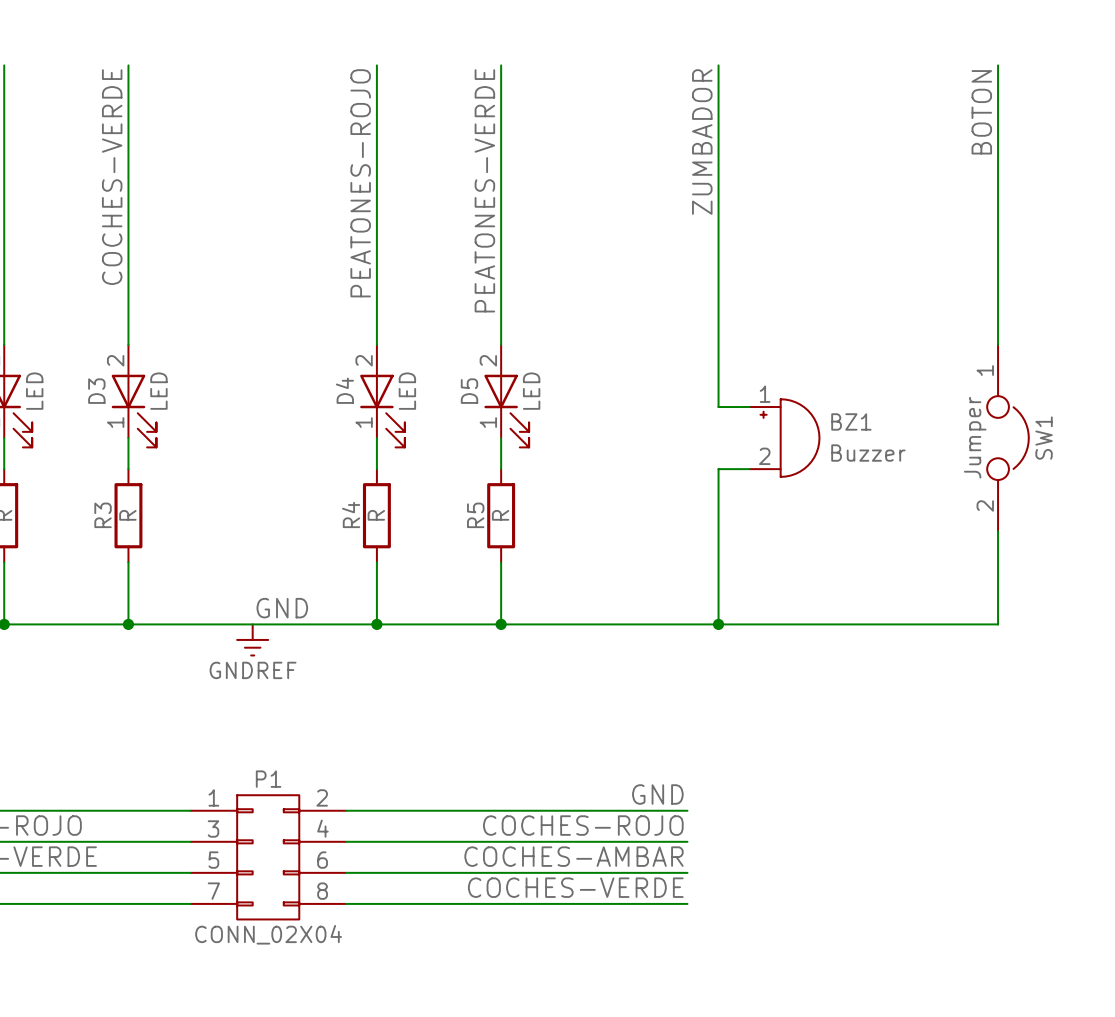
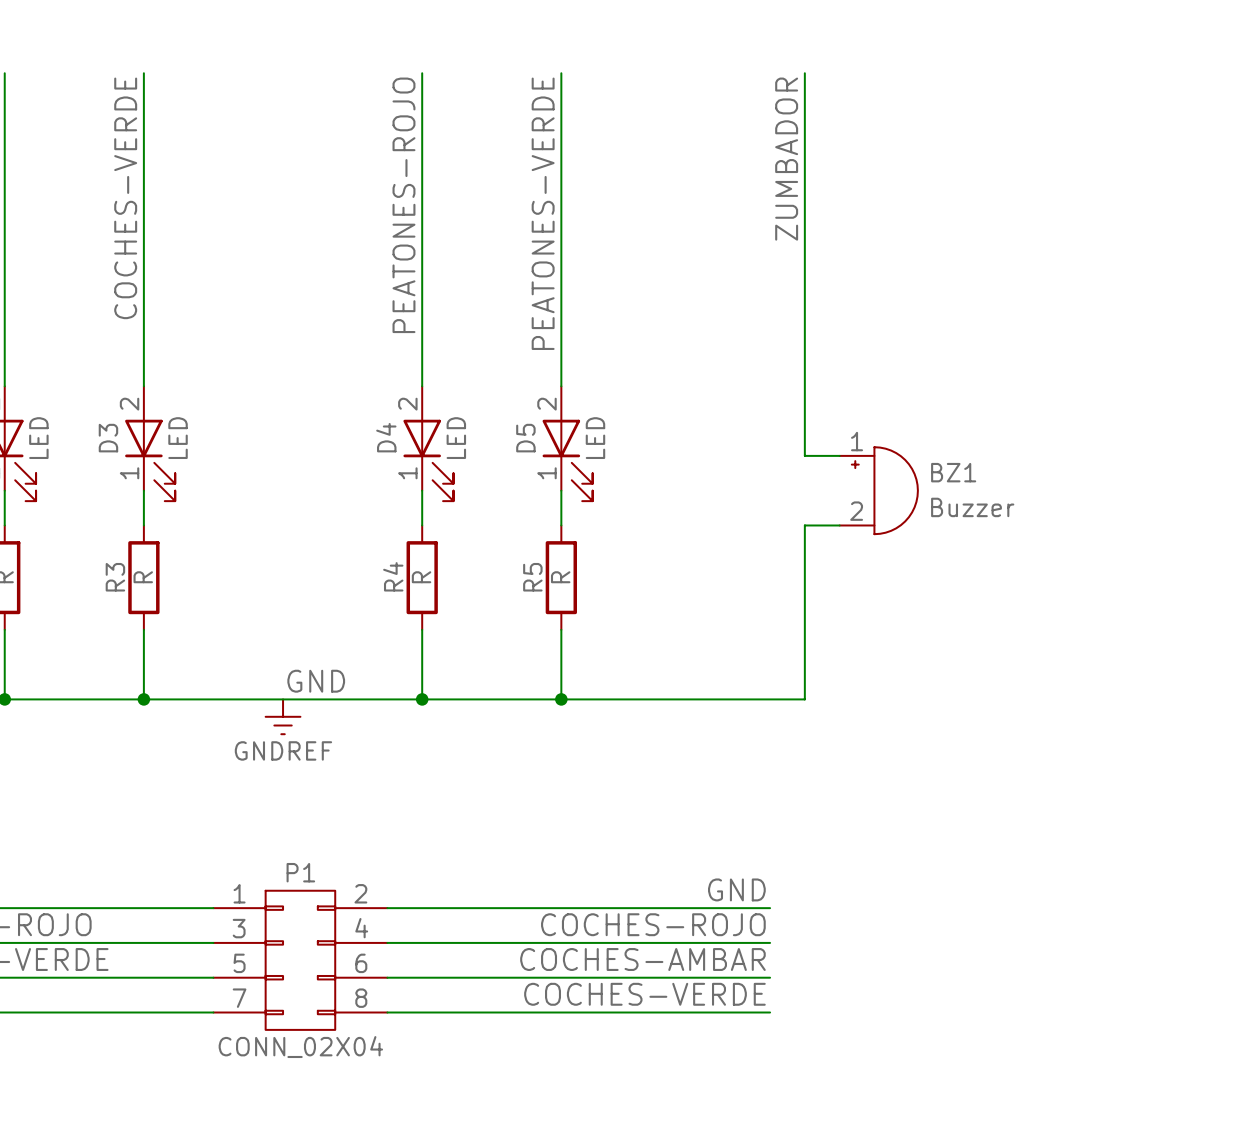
wire: (998, 65) (998, 344) -> none
label: BOTON (981, 112) -> none
SW1: Jumper (1007, 438) -> none
wire: (998, 531) (998, 624) (718, 624) -> none
junction: (718, 624) -> none

